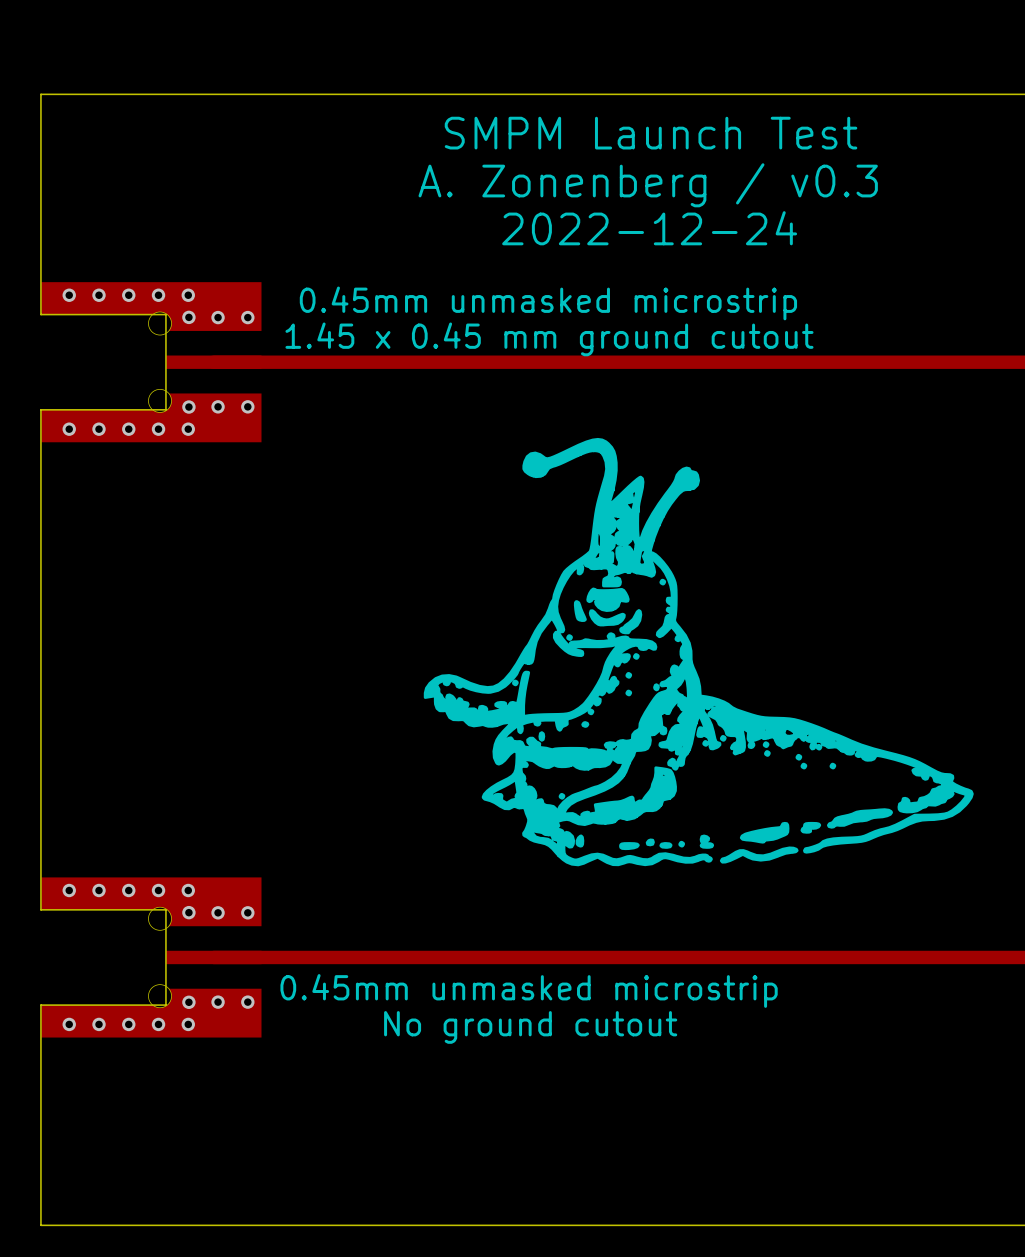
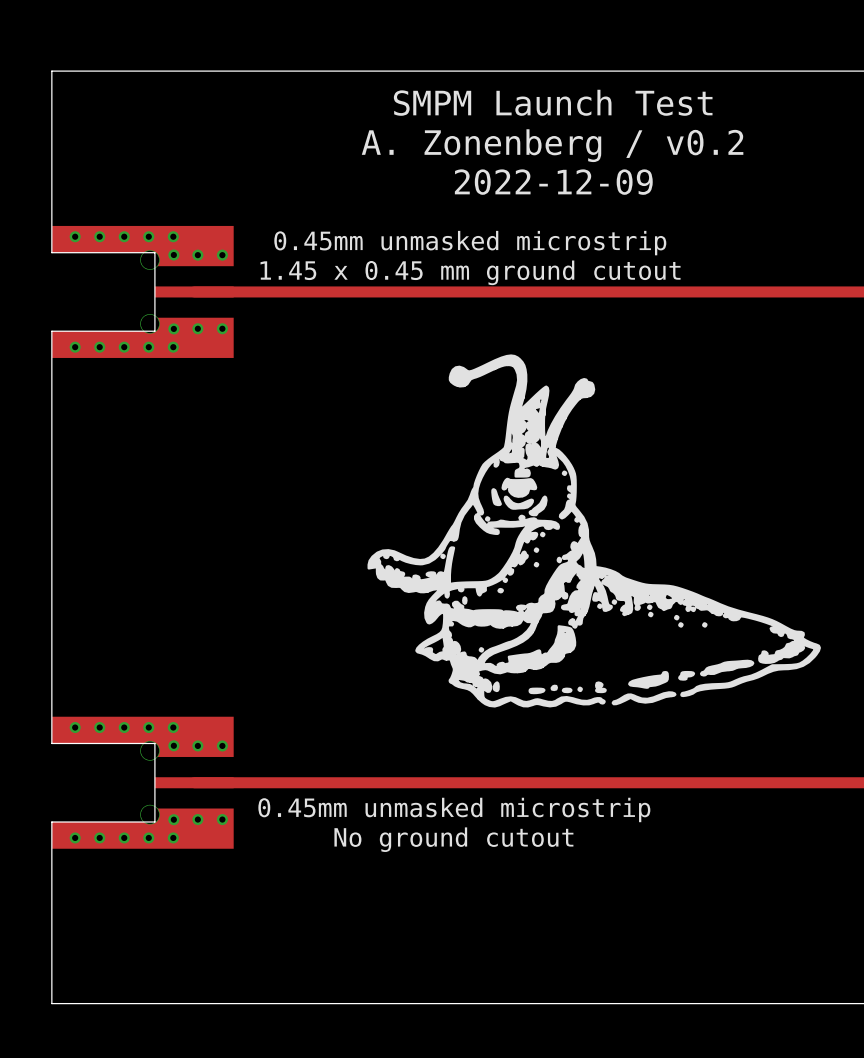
text: A. Zonenberg / v0.3 (648, 185) -> A. Zonenberg / v0.2 (552, 145)
text: 2022-12-24 (649, 228) -> 2022-12-09 (553, 182)

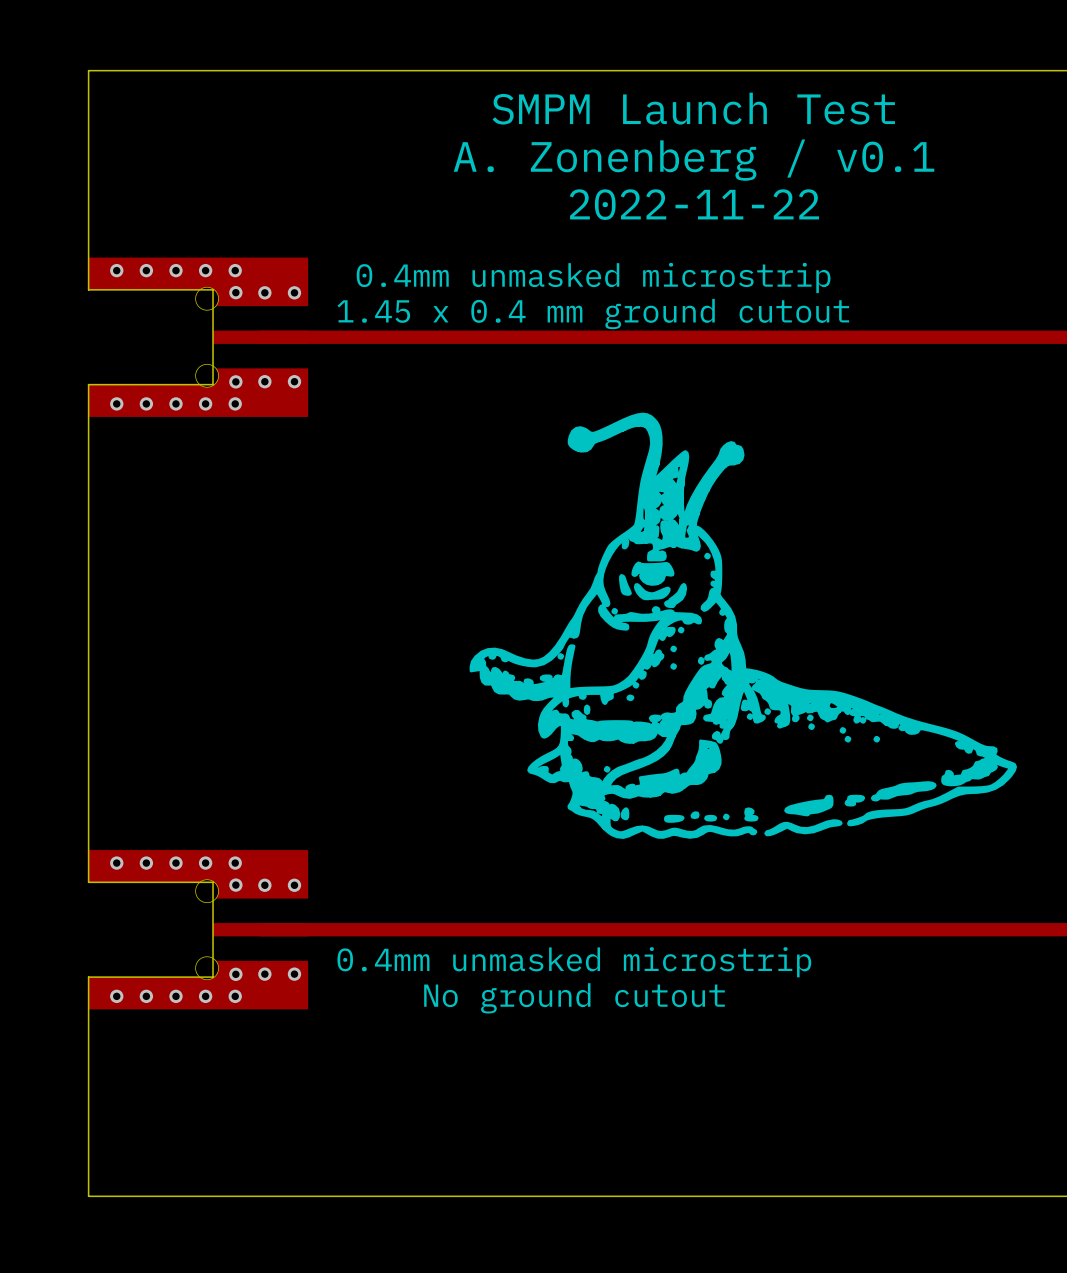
text: A. Zonenberg / v0.2 (552, 145) -> A. Zonenberg / v0.1 (694, 160)
text: 2022-12-09 (553, 182) -> 2022-11-22 (694, 204)
text: 0.45mm unmasked microstrip (470, 243) -> 0.4mm unmasked microstrip (593, 277)
text: 1.45 x 0.45 mm ground cutout (470, 272) -> 1.45 x 0.4 mm ground cutout (593, 314)
text: 0.45mm unmasked microstrip (454, 809) -> 0.4mm unmasked microstrip (574, 962)

